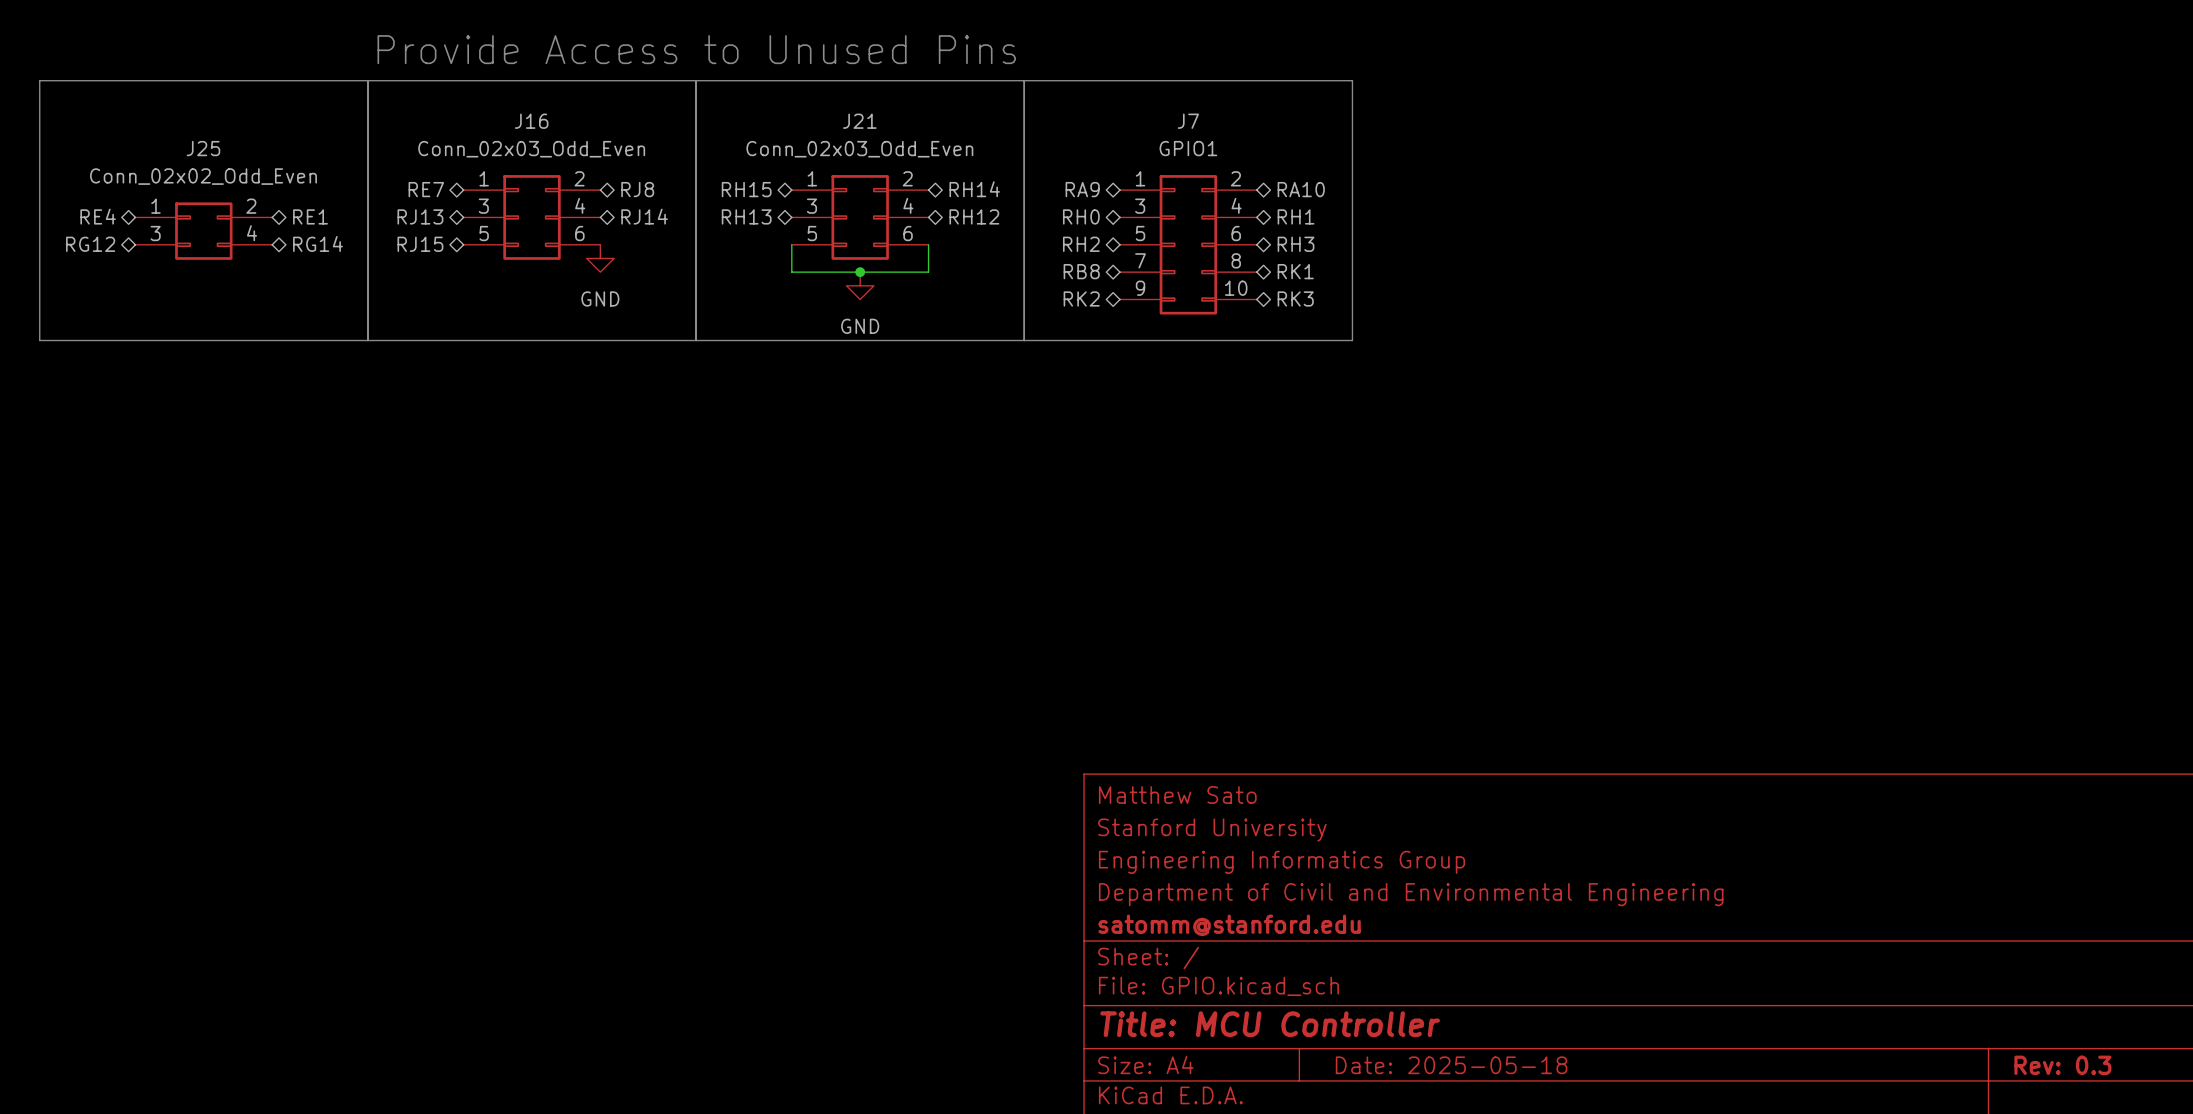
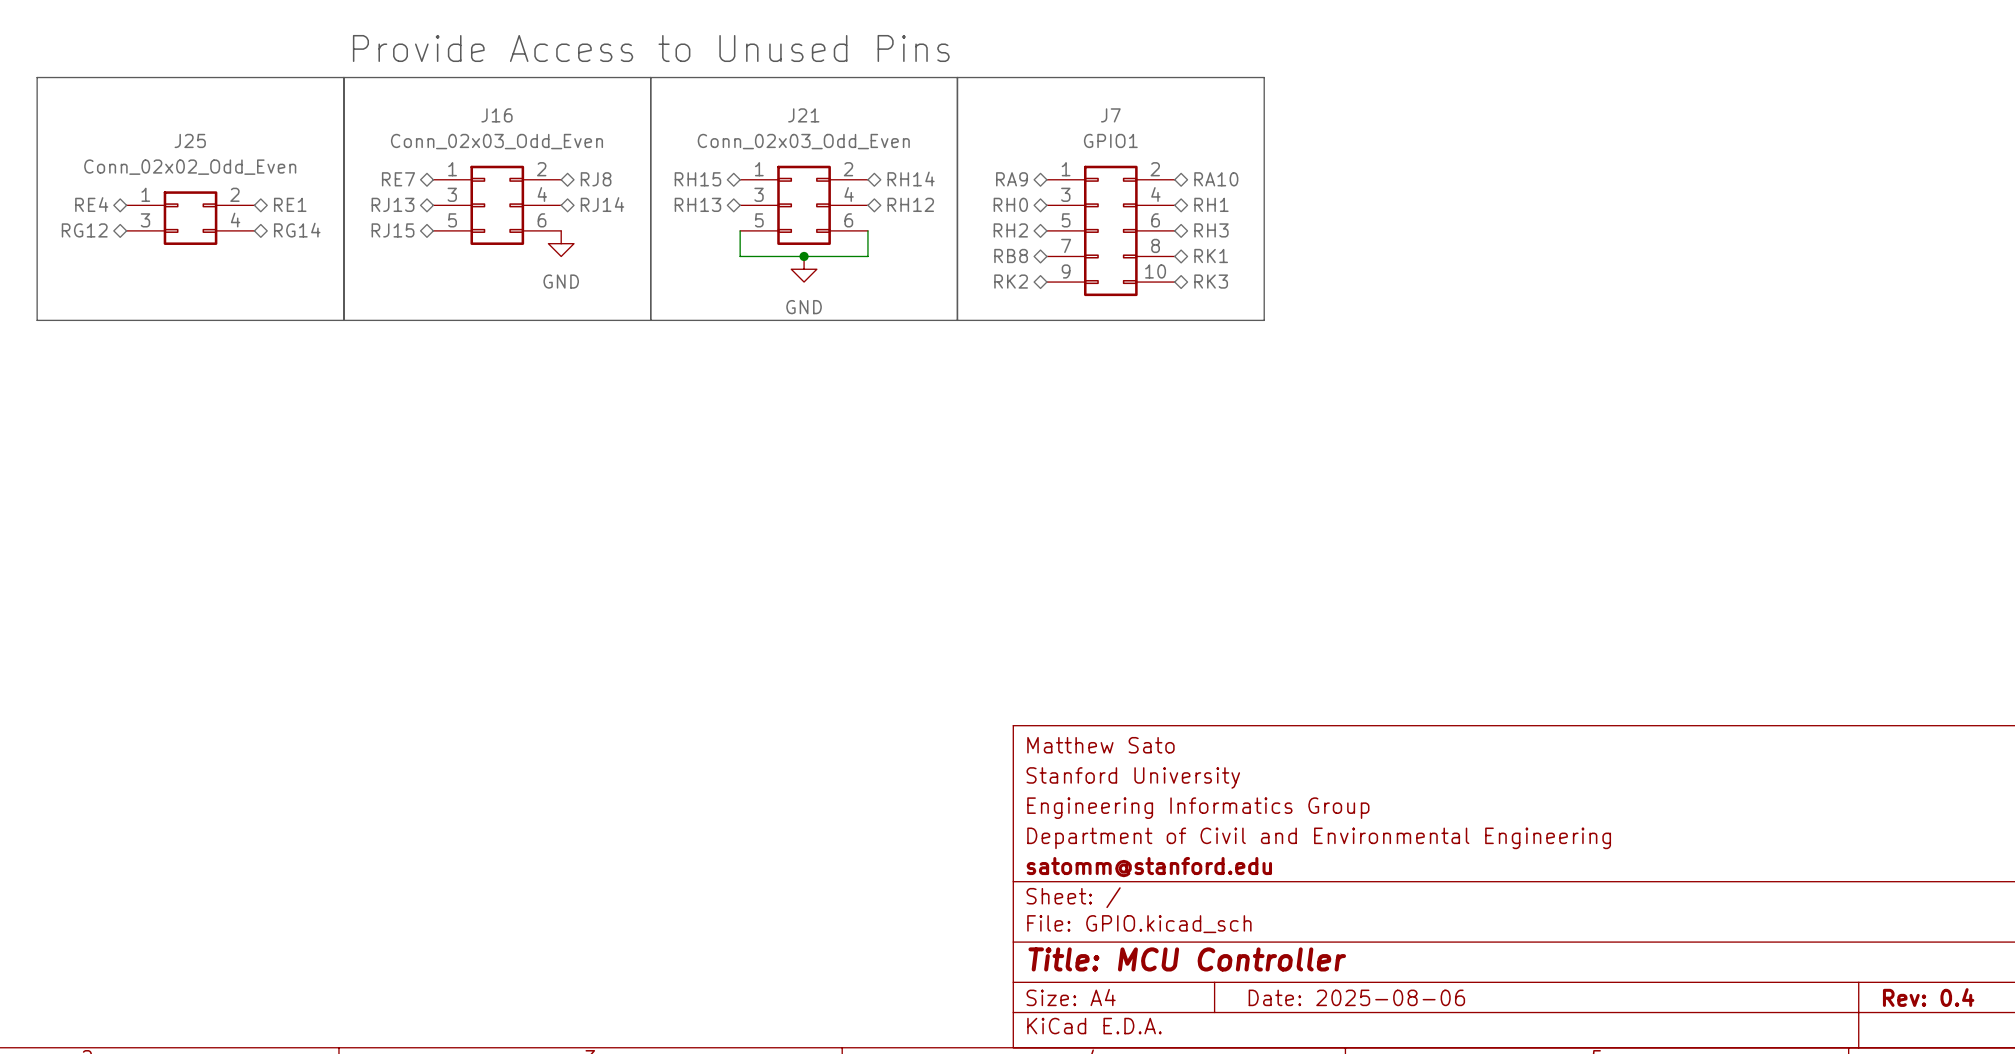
title block: Date: 2025-05-18 (1451, 1065) -> Date: 2025-08-06 (1356, 997)
title block: Rev: 0.3 (2062, 1065) -> Rev: 0.4 (1928, 997)

